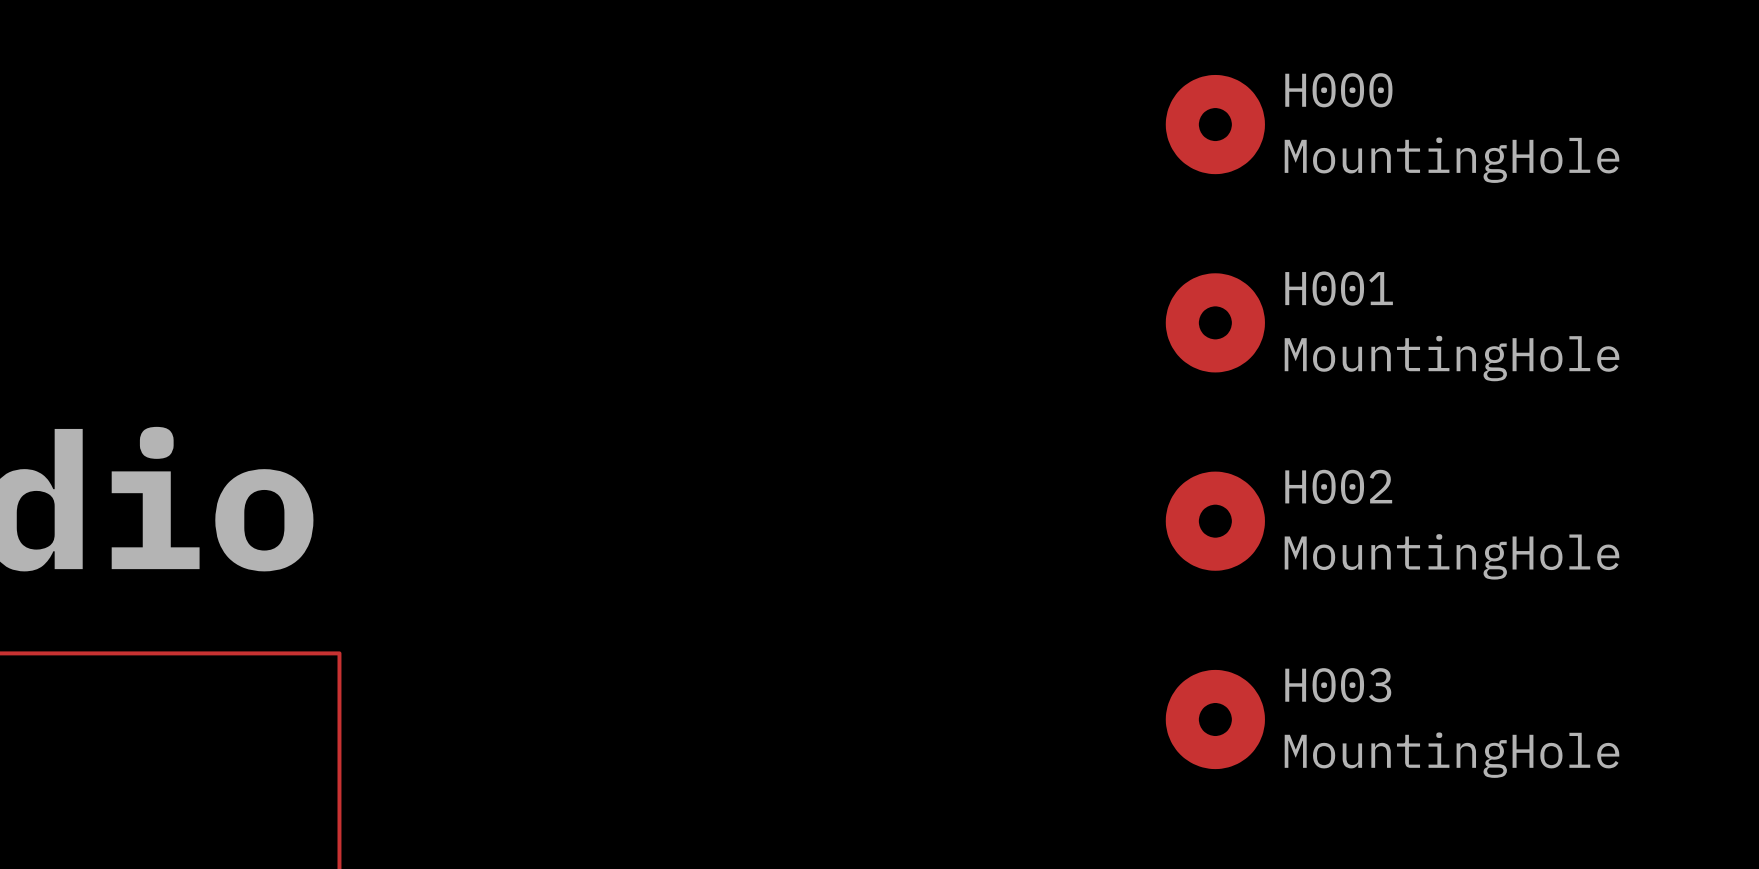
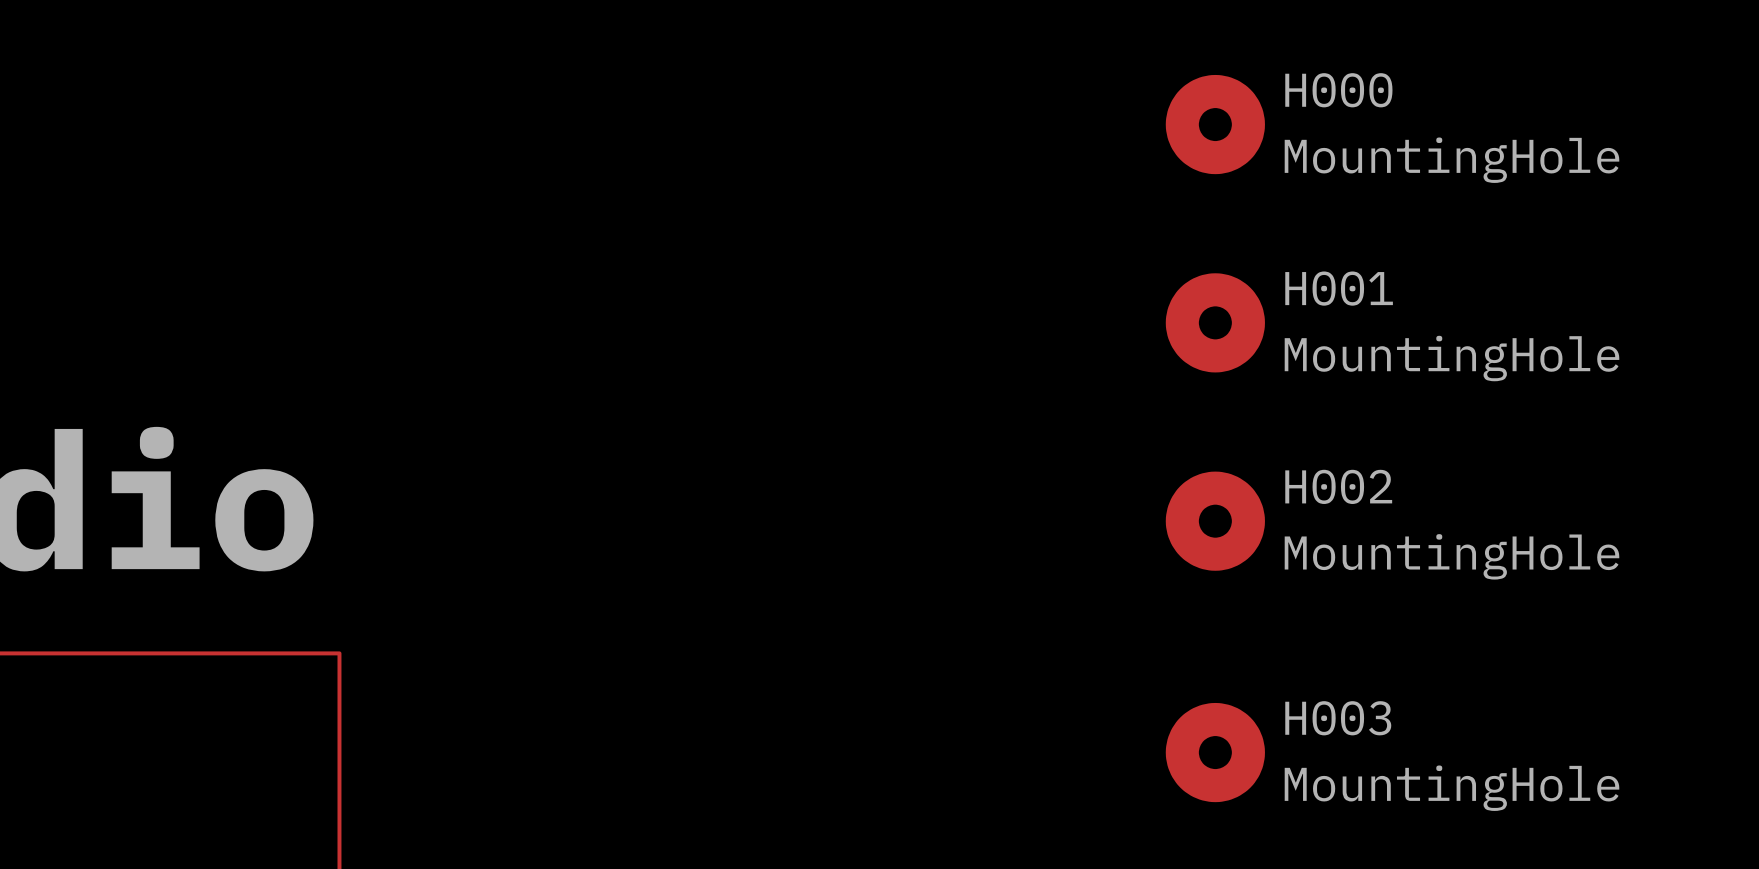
H003 position: (1215, 719) -> (1215, 752)

